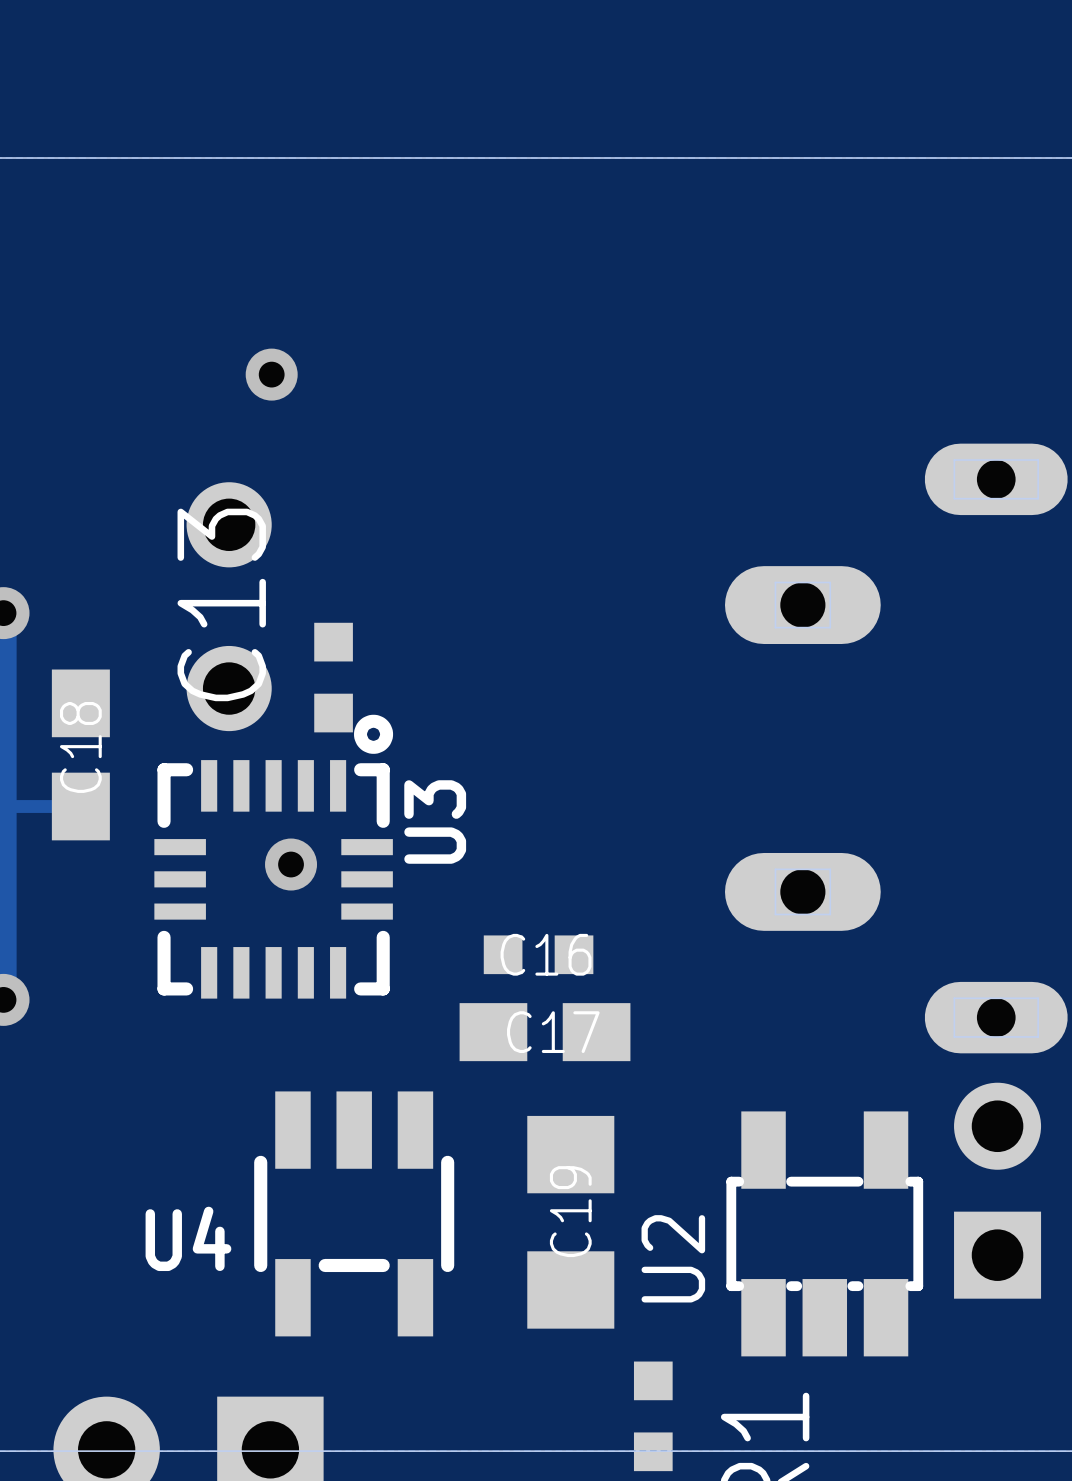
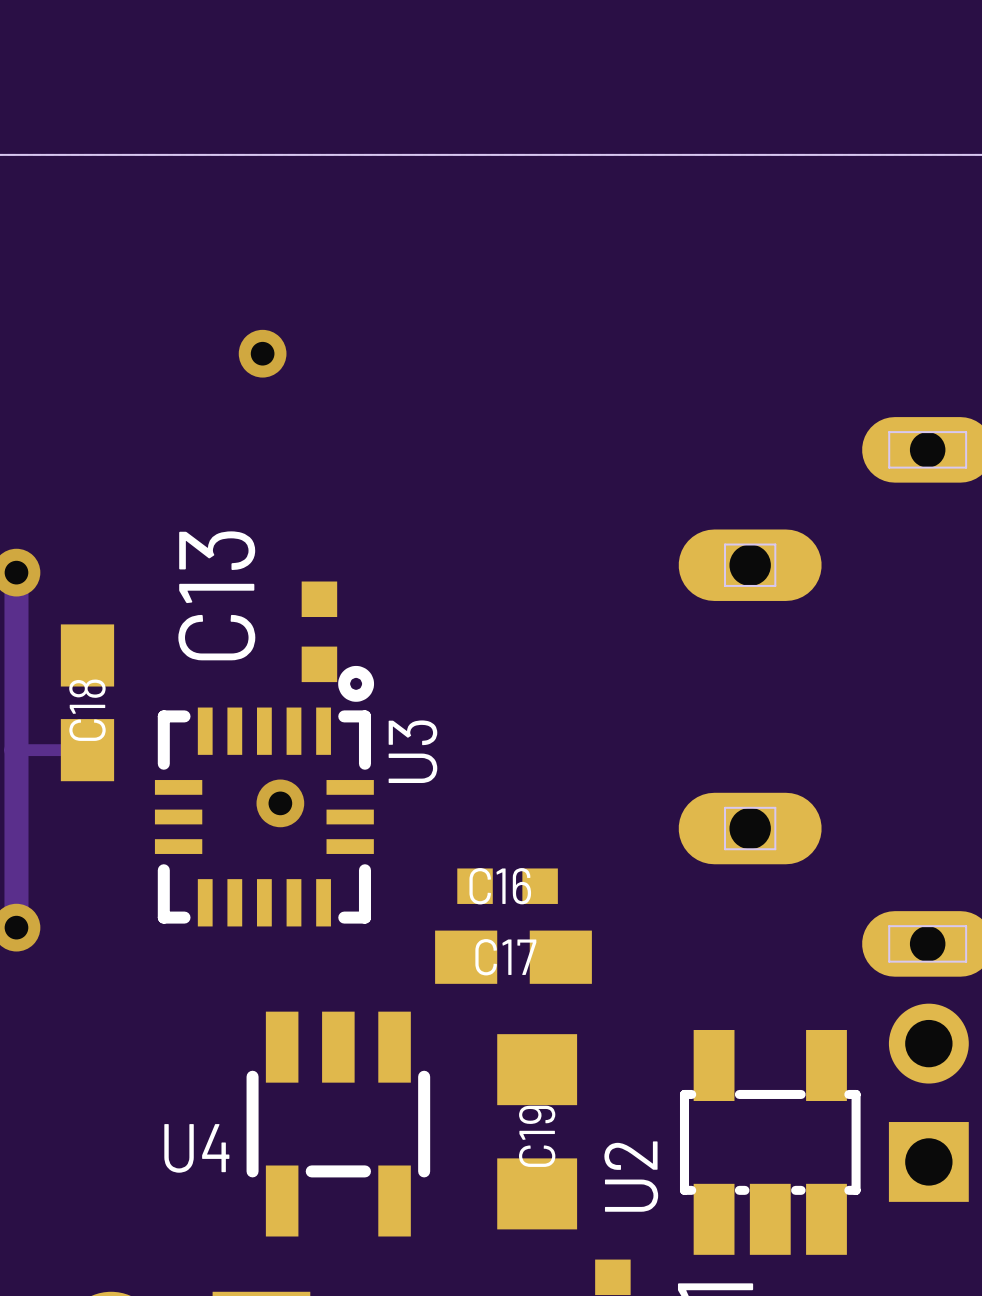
part: (229, 606) -> none

